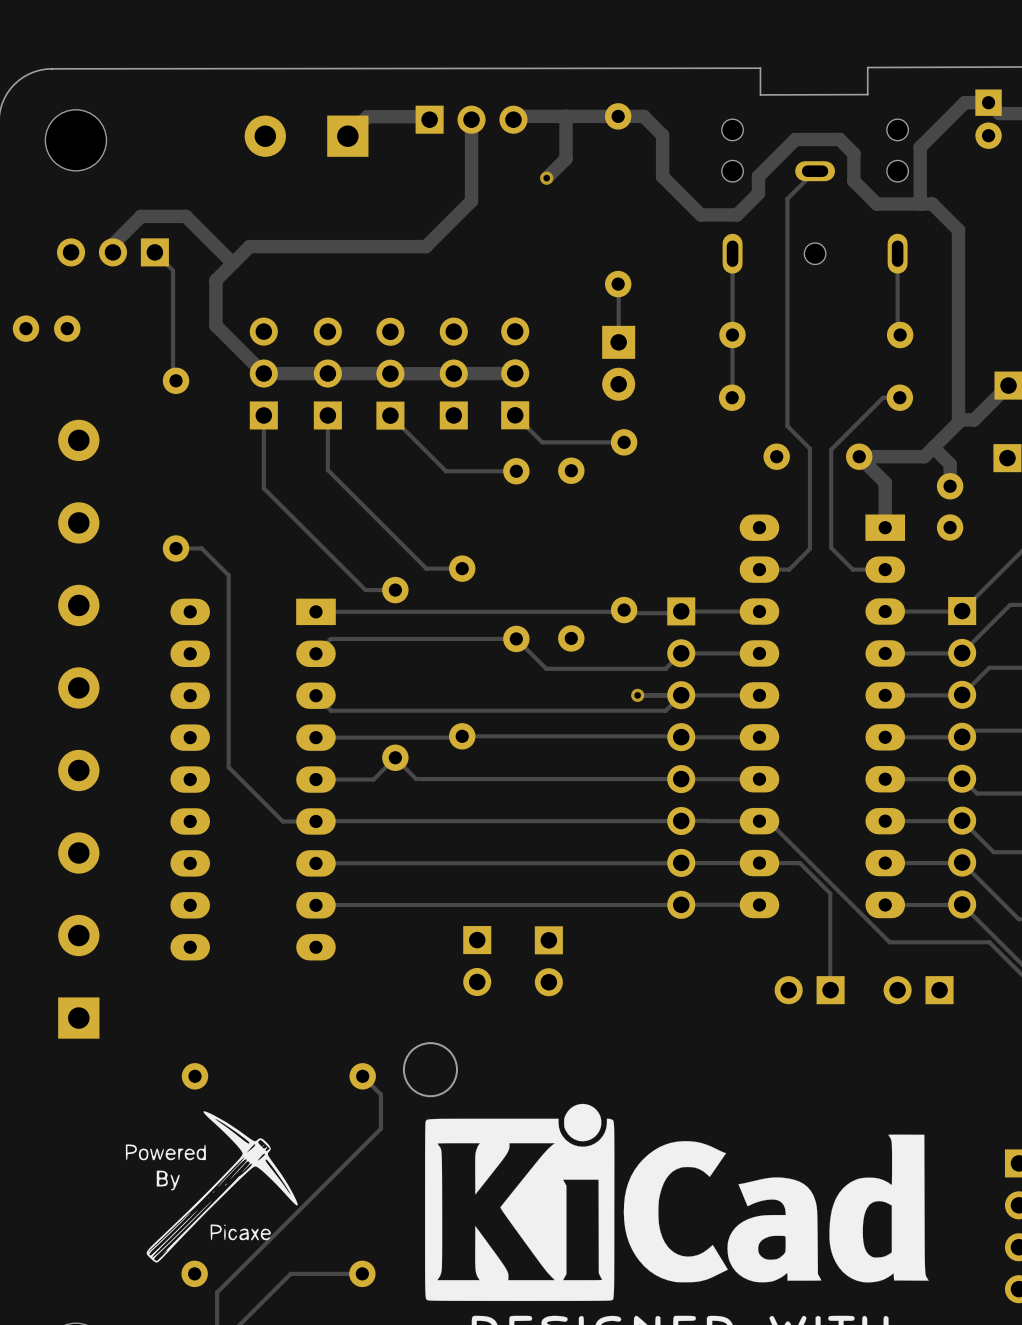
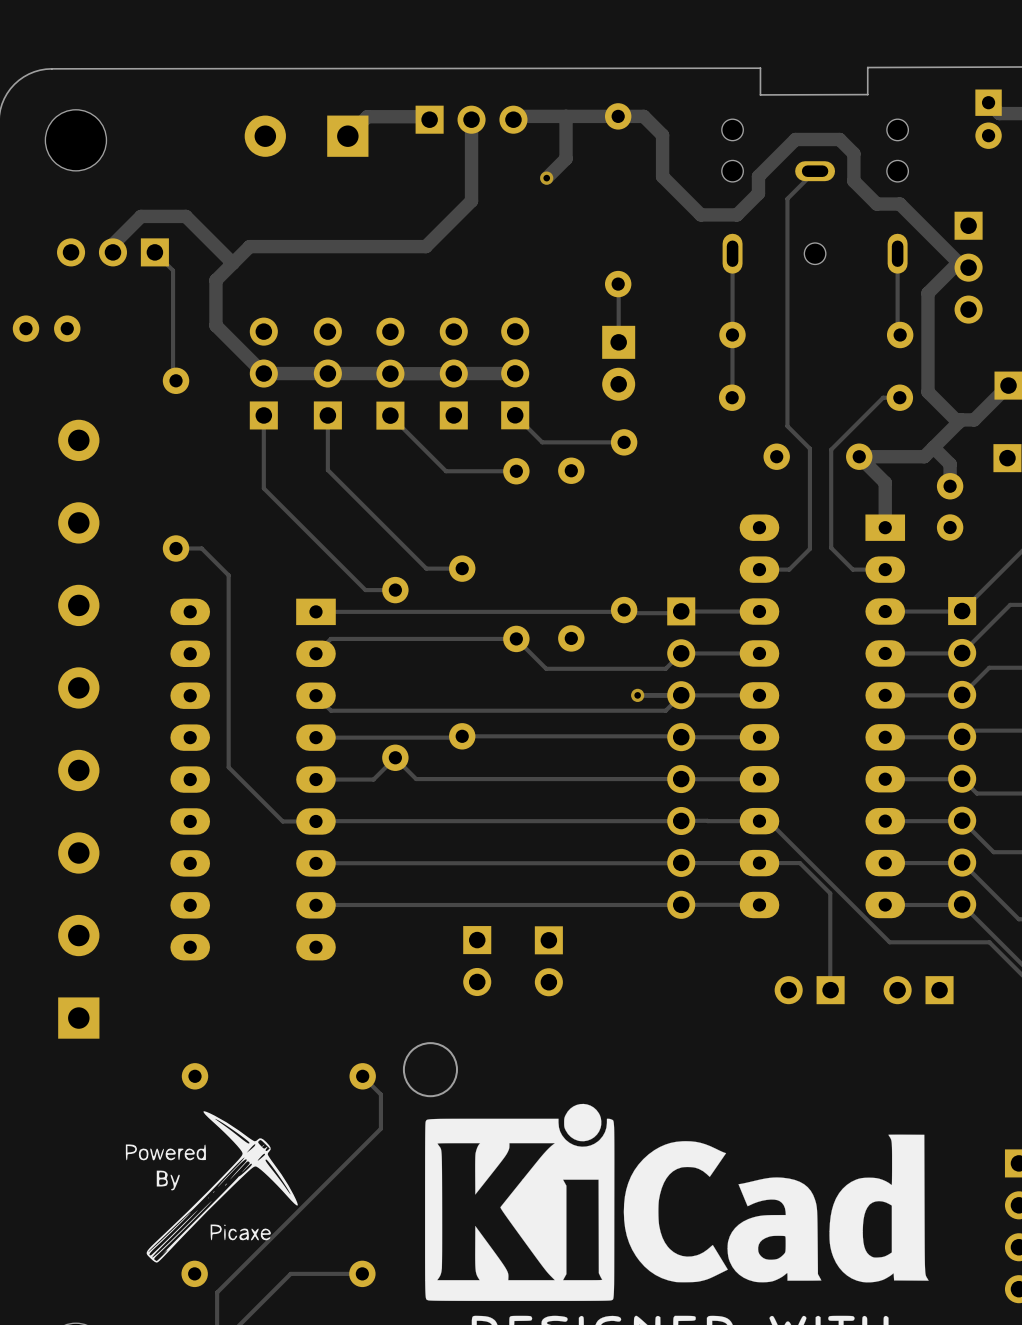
track: (988, 102) (964, 102) (920, 147) (920, 204) -> none
track: (899, 204) (932, 204) (958, 230) (958, 422) -> (958, 262) (927, 293) (927, 392) (958, 422)
track: none -> (899, 204) (963, 267) (968, 267)
part: none -> (968, 267)

